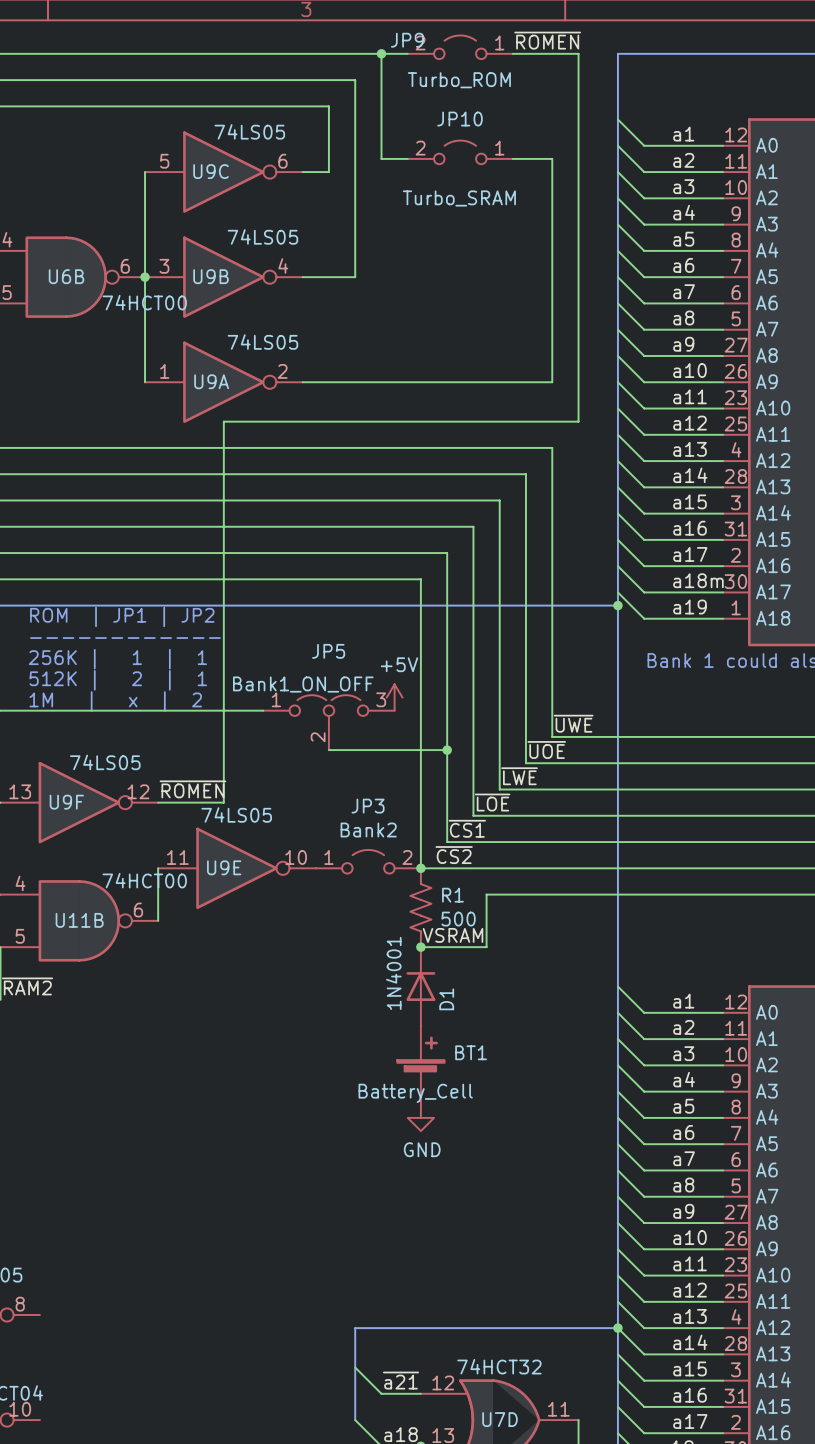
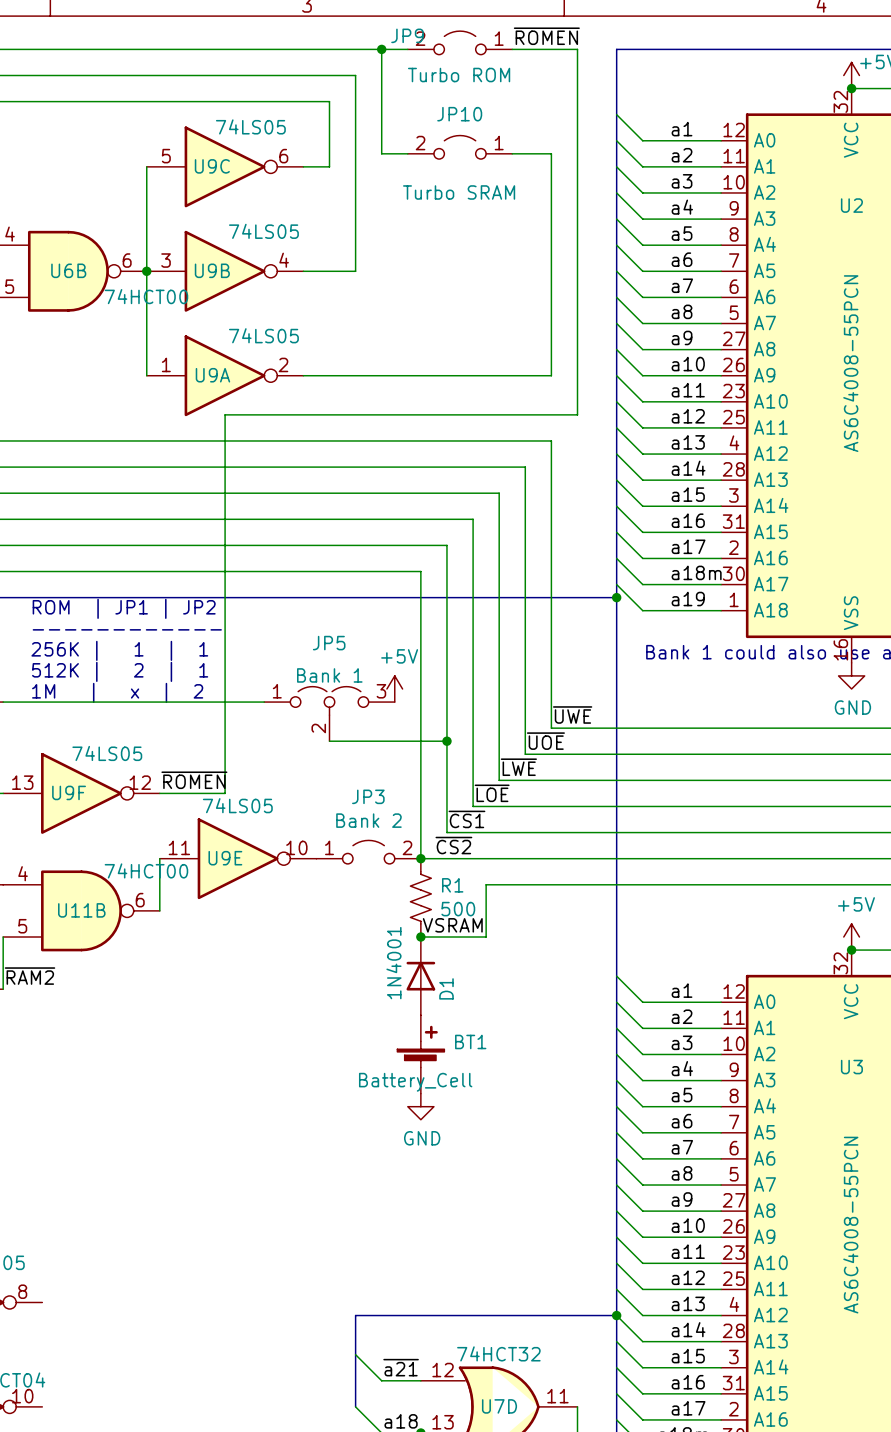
JP9 value: Turbo_ROM (459, 80) -> Turbo ROM (459, 75)
JP10 value: Turbo_SRAM (459, 198) -> Turbo SRAM (459, 192)
JP5 value: Bank1_ON_OFF (303, 684) -> Bank 1 (329, 675)
JP3 value: Bank2 (368, 830) -> Bank 2 (368, 820)

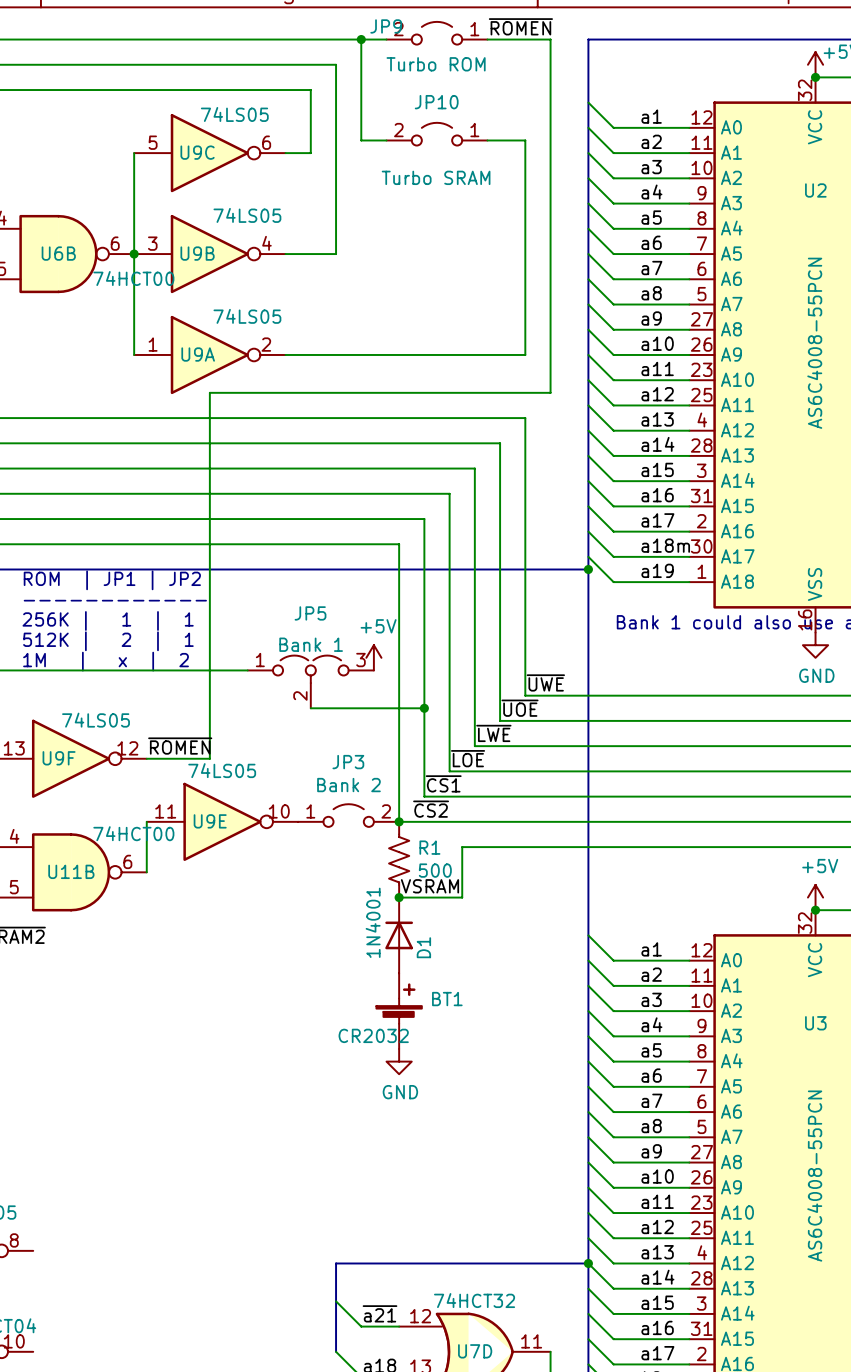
BT1 value: Battery_Cell (415, 1082) -> CR2032 (373, 1035)

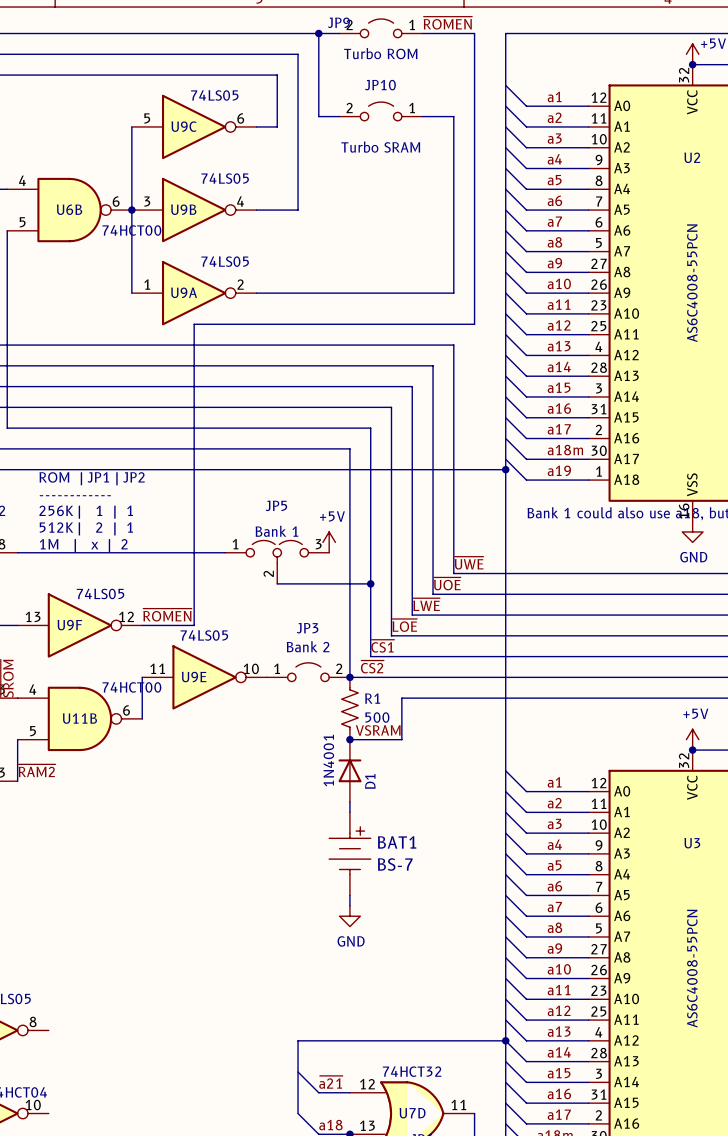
BT1: CR2032 (399, 1011) -> none
BAT1: none -> BS-7 (349, 853)
power symbol position: GND (399, 1061) -> GND (349, 916)
wire: none -> (349, 895) (349, 905)

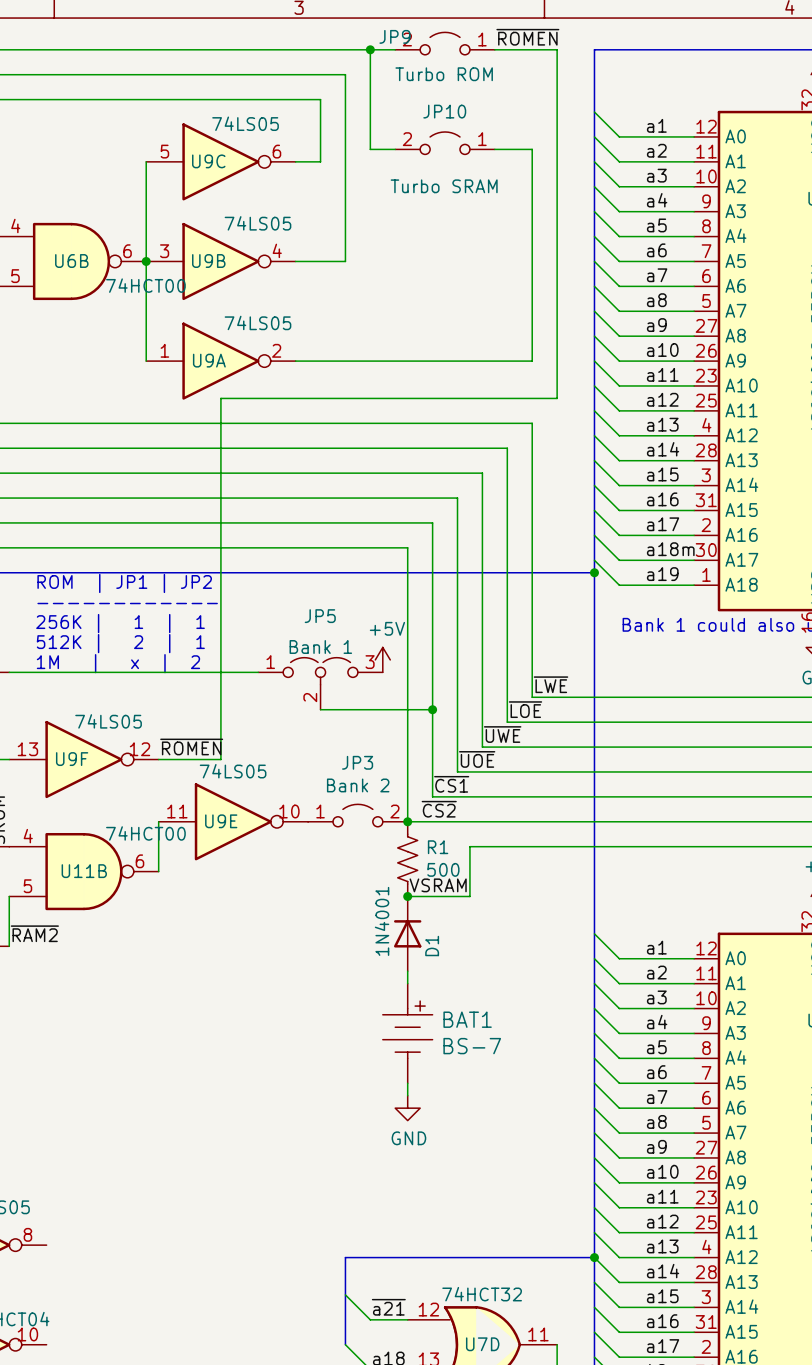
label: ~{UWE} (469, 563) -> ~{LWE} (550, 684)
label: ~{UOE} (447, 583) -> ~{LOE} (525, 709)
label: ~{LWE} (426, 604) -> ~{UWE} (502, 734)
label: ~{LOE} (404, 625) -> ~{UOE} (477, 759)

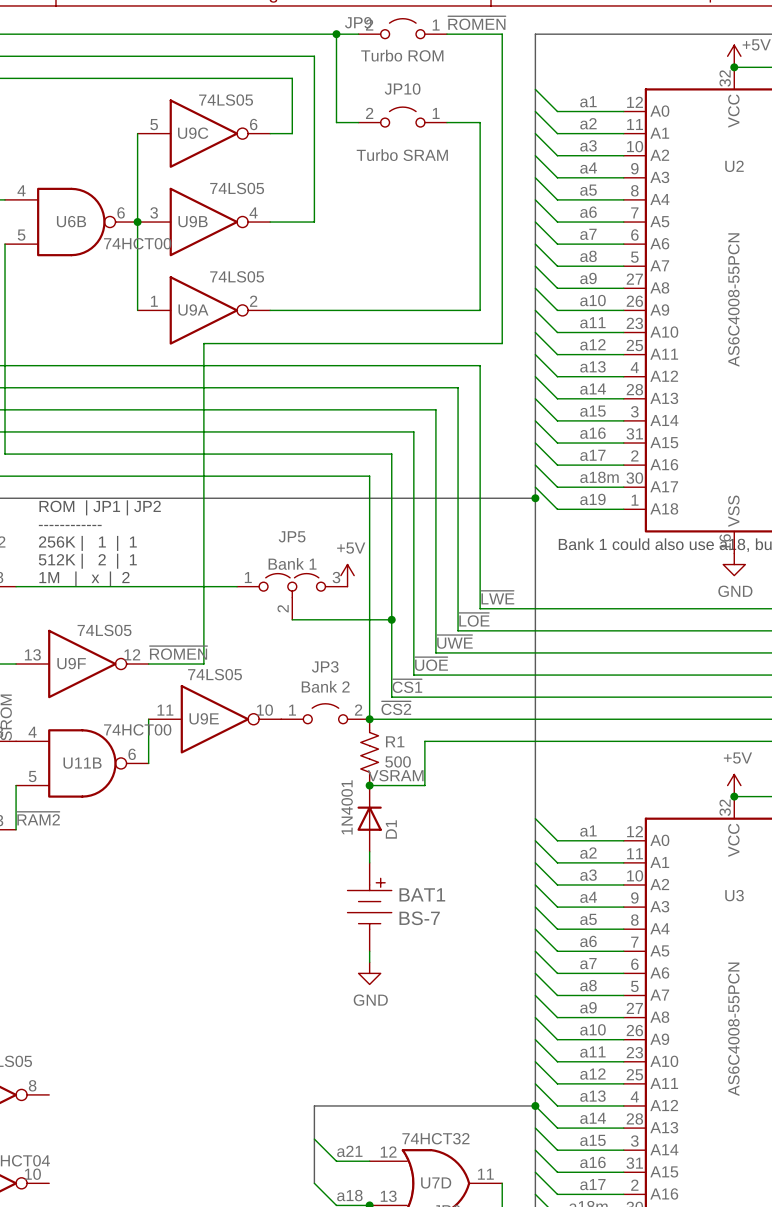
label: ~{a21} (388, 1307) -> a21 (349, 1151)

